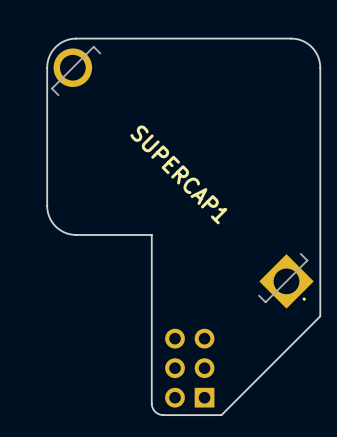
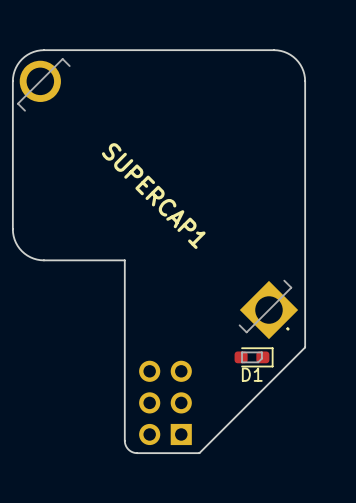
D1: none -> (253, 357)

